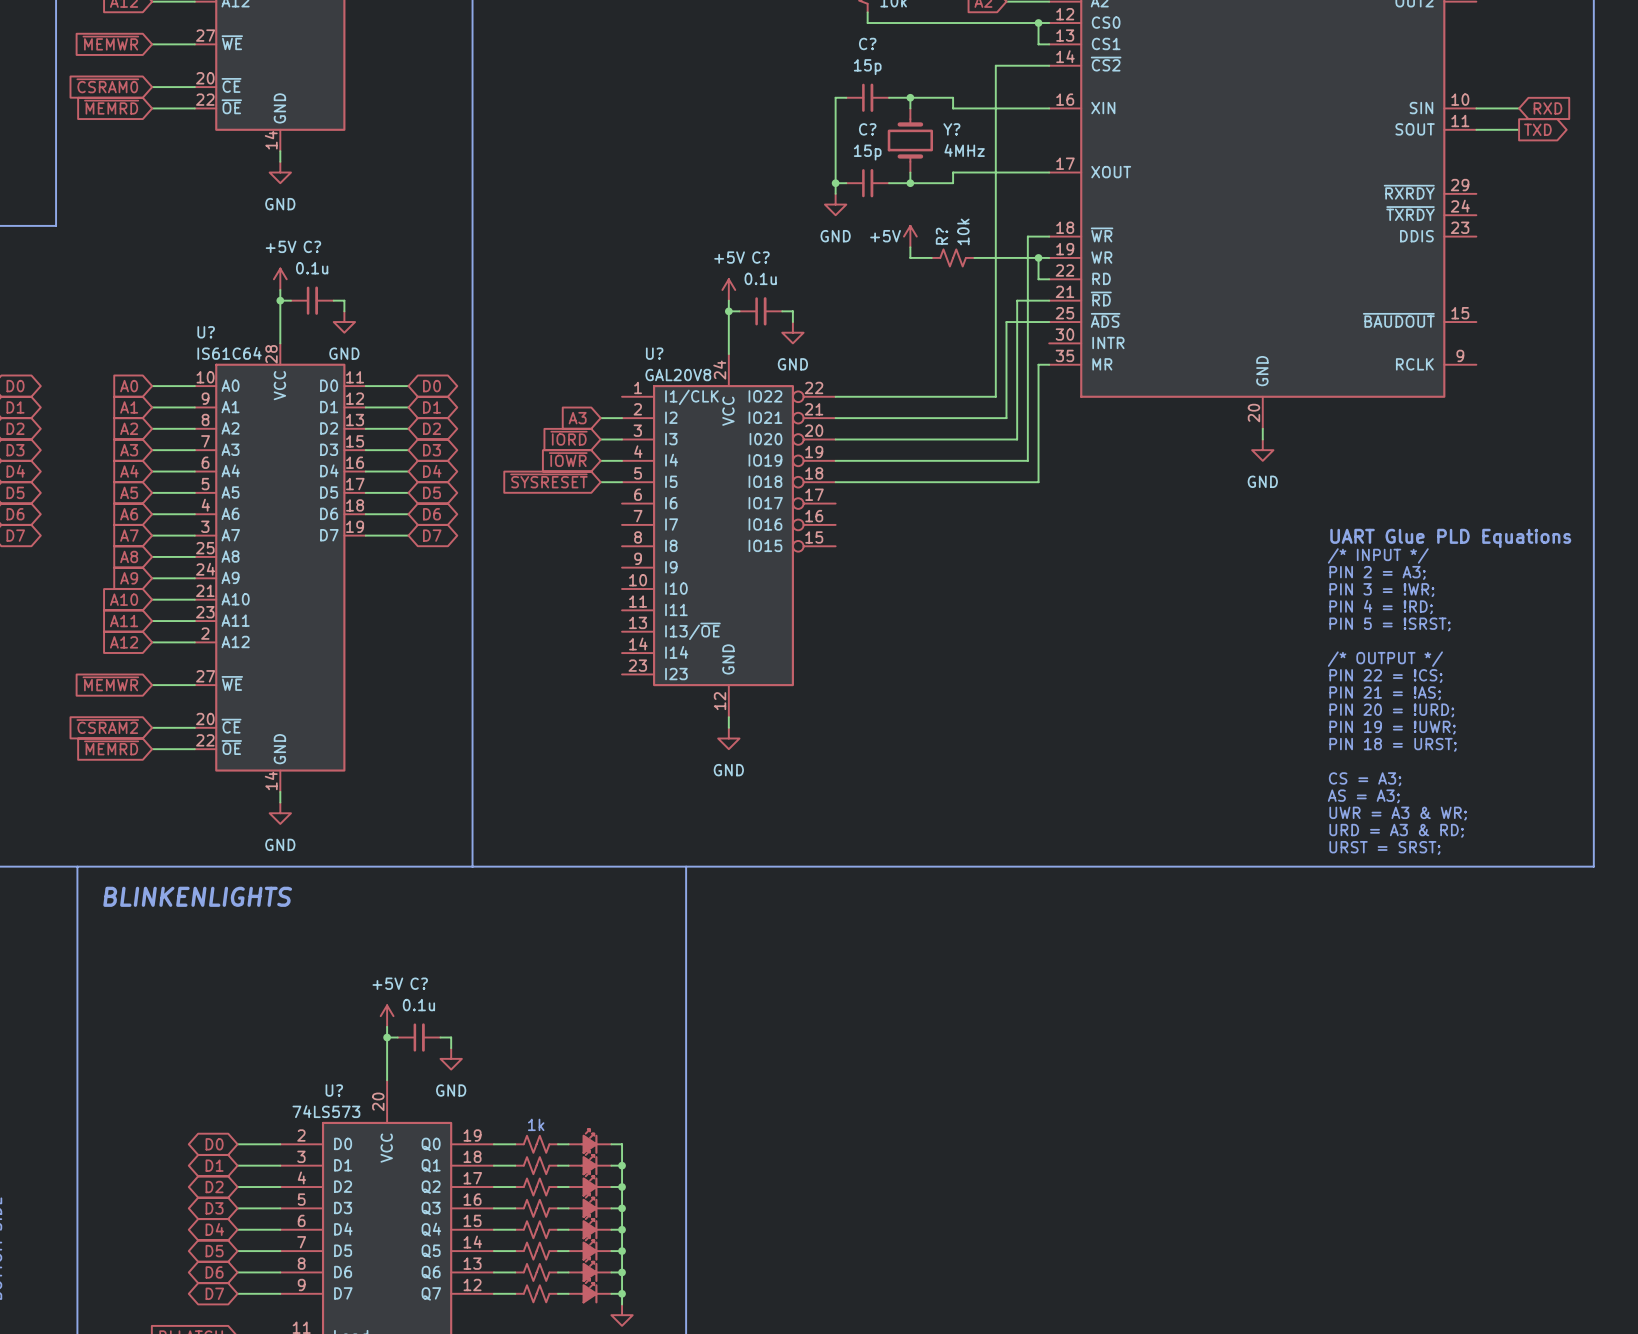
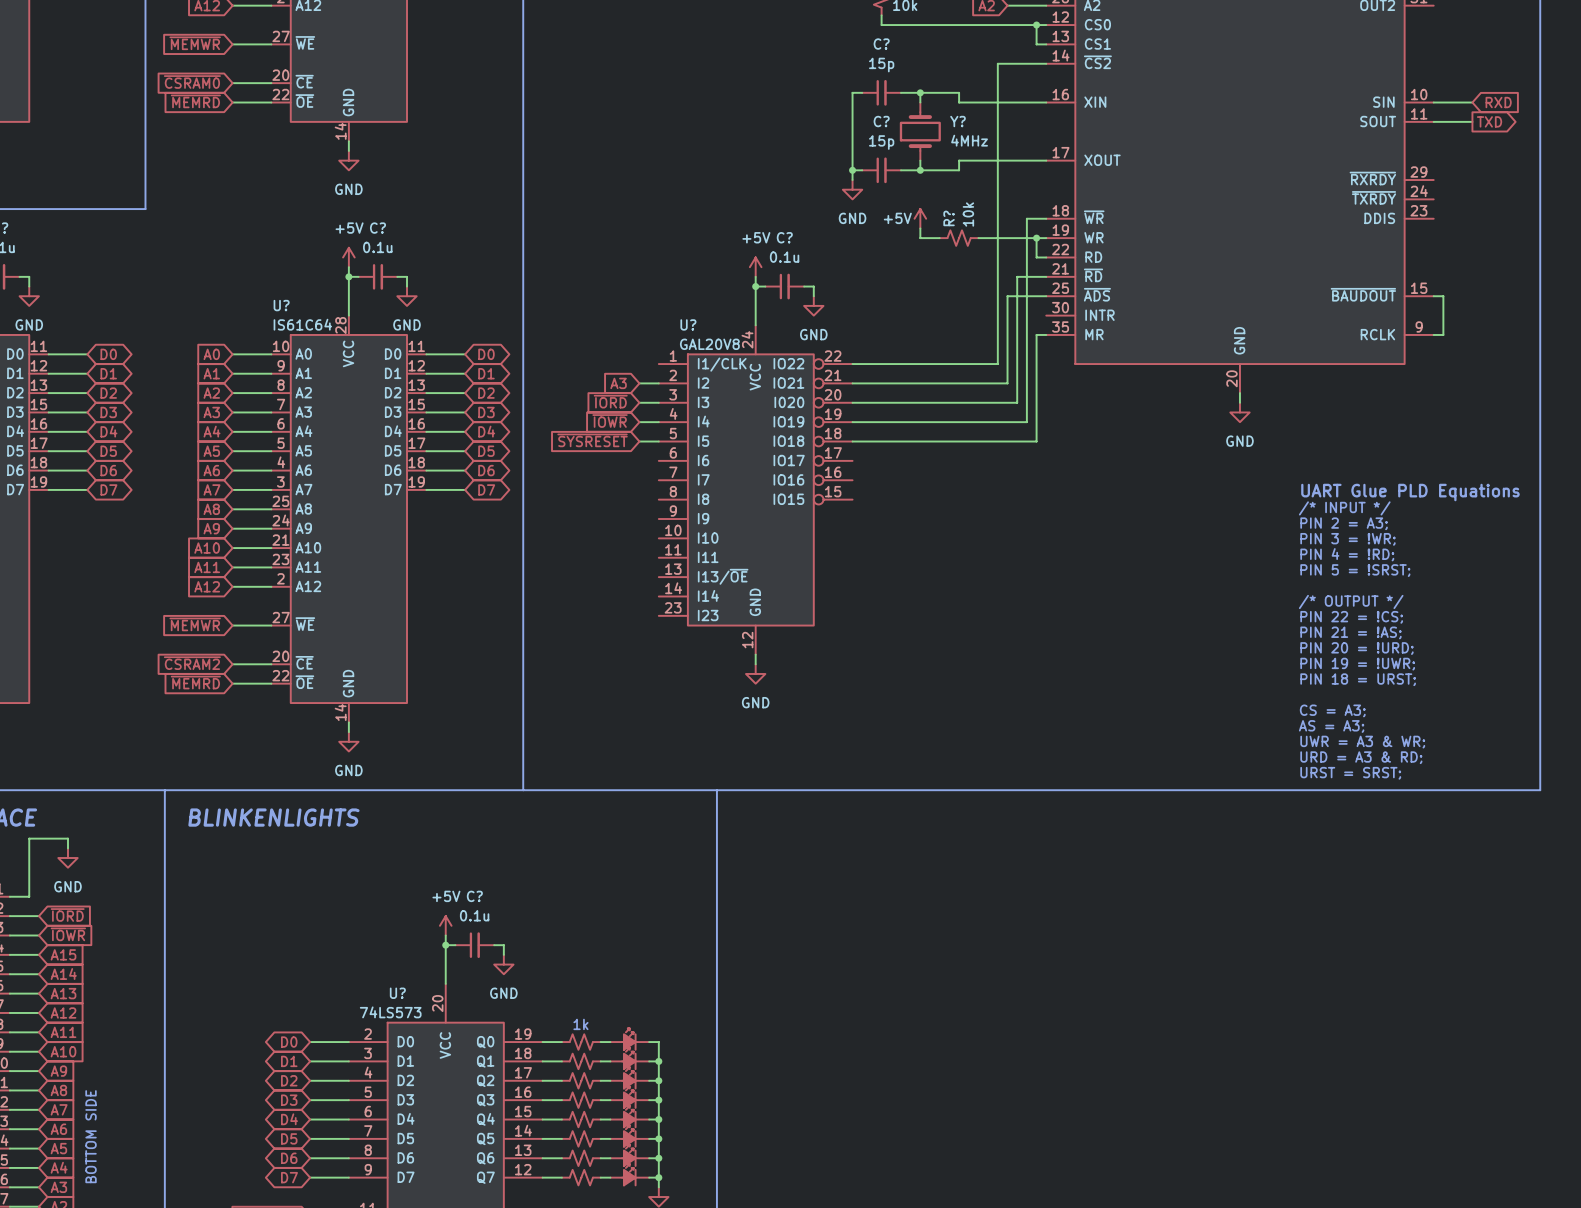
wire: none -> (1433, 296) (1443, 296) (1443, 334) (1433, 334)

